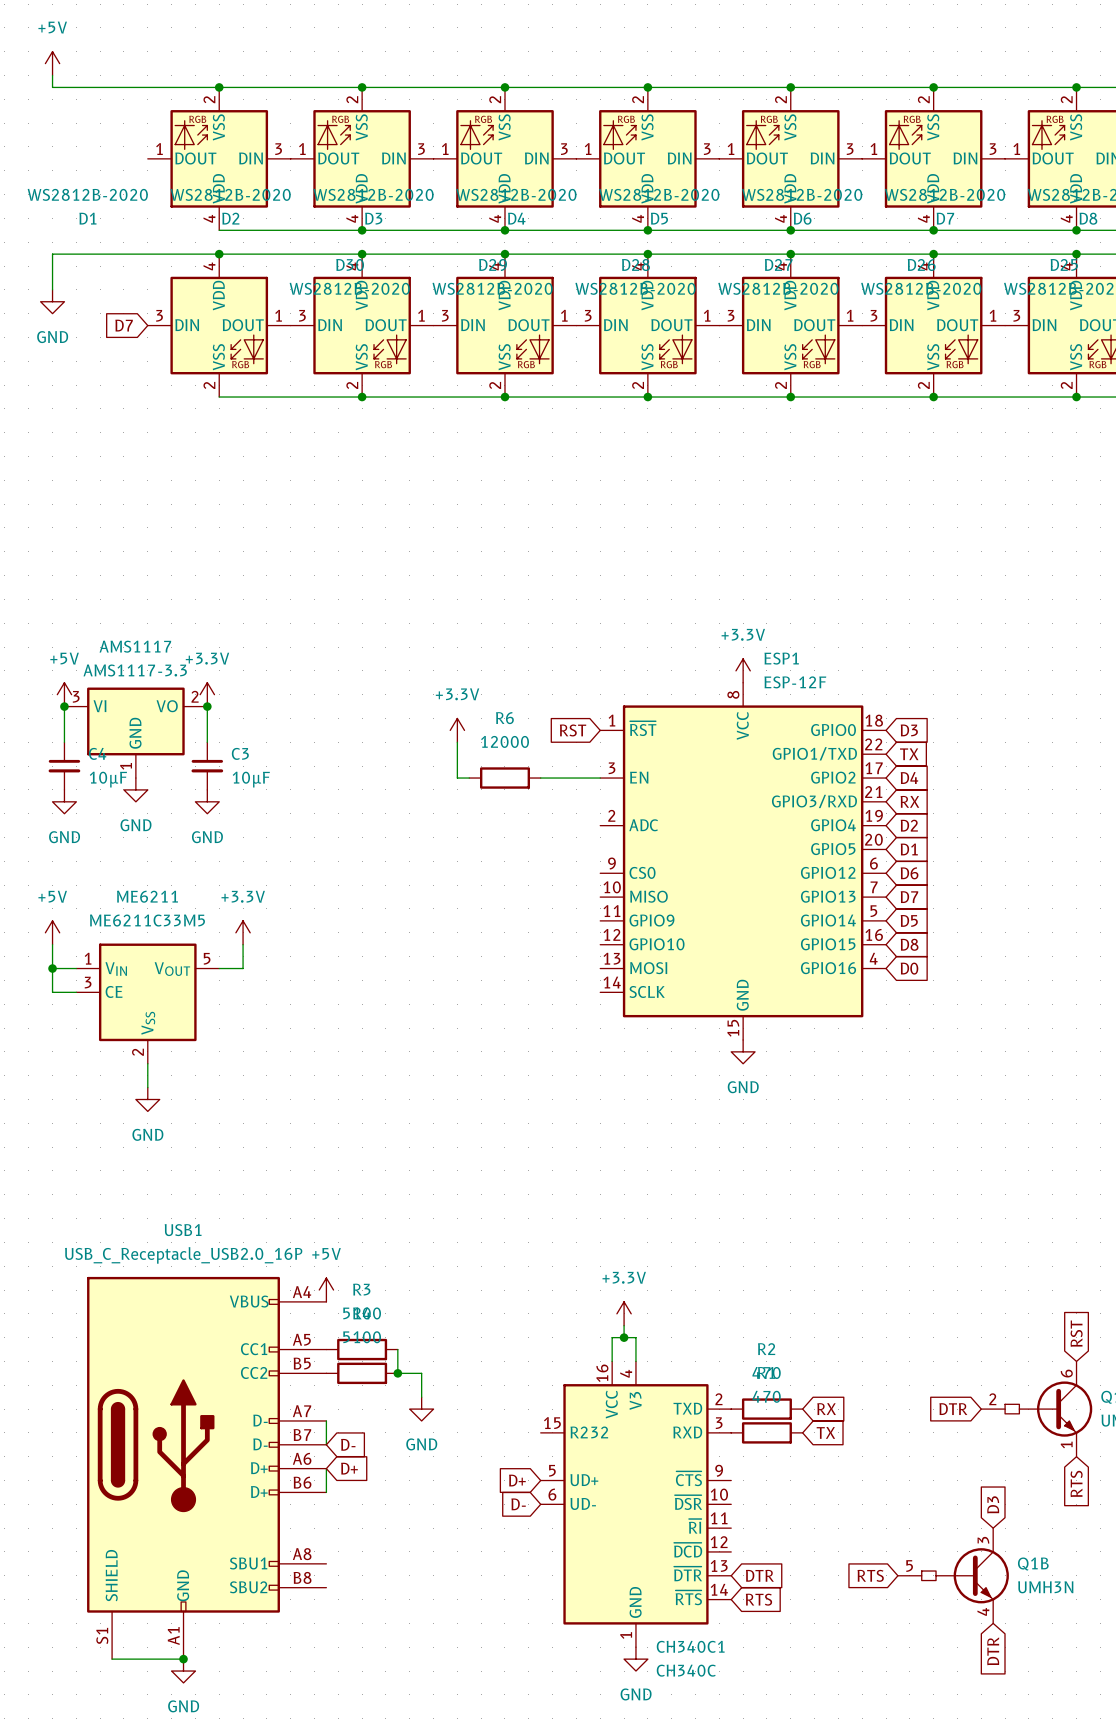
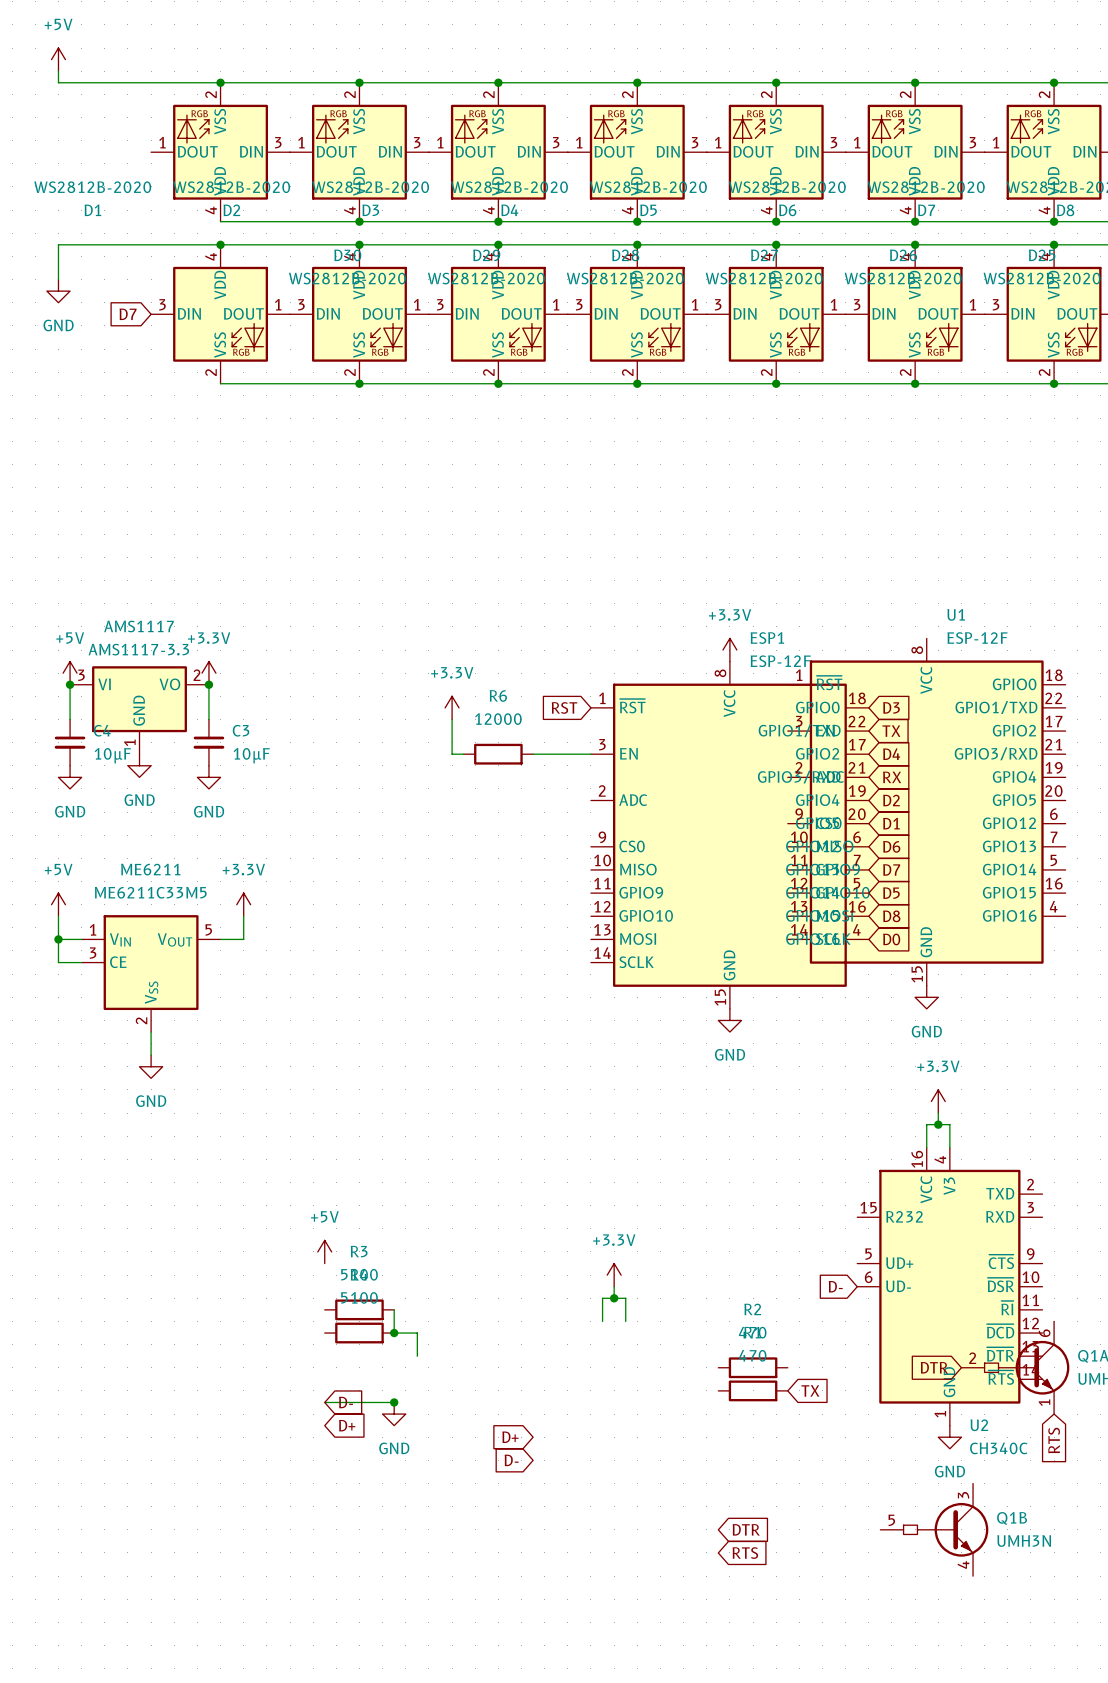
U1: none -> ESP-12F (926, 812)
power symbol: none -> GND (926, 997)
power symbol: none -> +3.3V (938, 1101)
wire: none -> (938, 1113) (938, 1124)
junction: none -> (938, 1124)
wire: none -> (926, 1147) (926, 1124) (949, 1124) (949, 1147)
global label: none -> D- (835, 1286)
U2: none -> CH340C (949, 1286)
global label: RST (1076, 1333) -> none
power symbol position: GND (421, 1409) -> GND (394, 1414)
global label: RX (826, 1409) -> none
wire: (326, 1420) (326, 1444) -> (394, 1402) (324, 1402)
junction: none -> (394, 1402)
USB1: USB_C_Receptacle_USB2.0_16P (206, 1468) -> none
wire: (326, 1468) (326, 1492) -> none
power symbol: none -> GND (949, 1437)
CH340C1: CH340C (635, 1504) -> none
global label: D3 (993, 1504) -> none
global label: RTS (870, 1575) -> none
global label: DTR (993, 1651) -> none
wire: (112, 1659) (183, 1659) -> none
junction: (183, 1659) -> none
power symbol: GND (635, 1659) -> none
power symbol: GND (183, 1671) -> none

